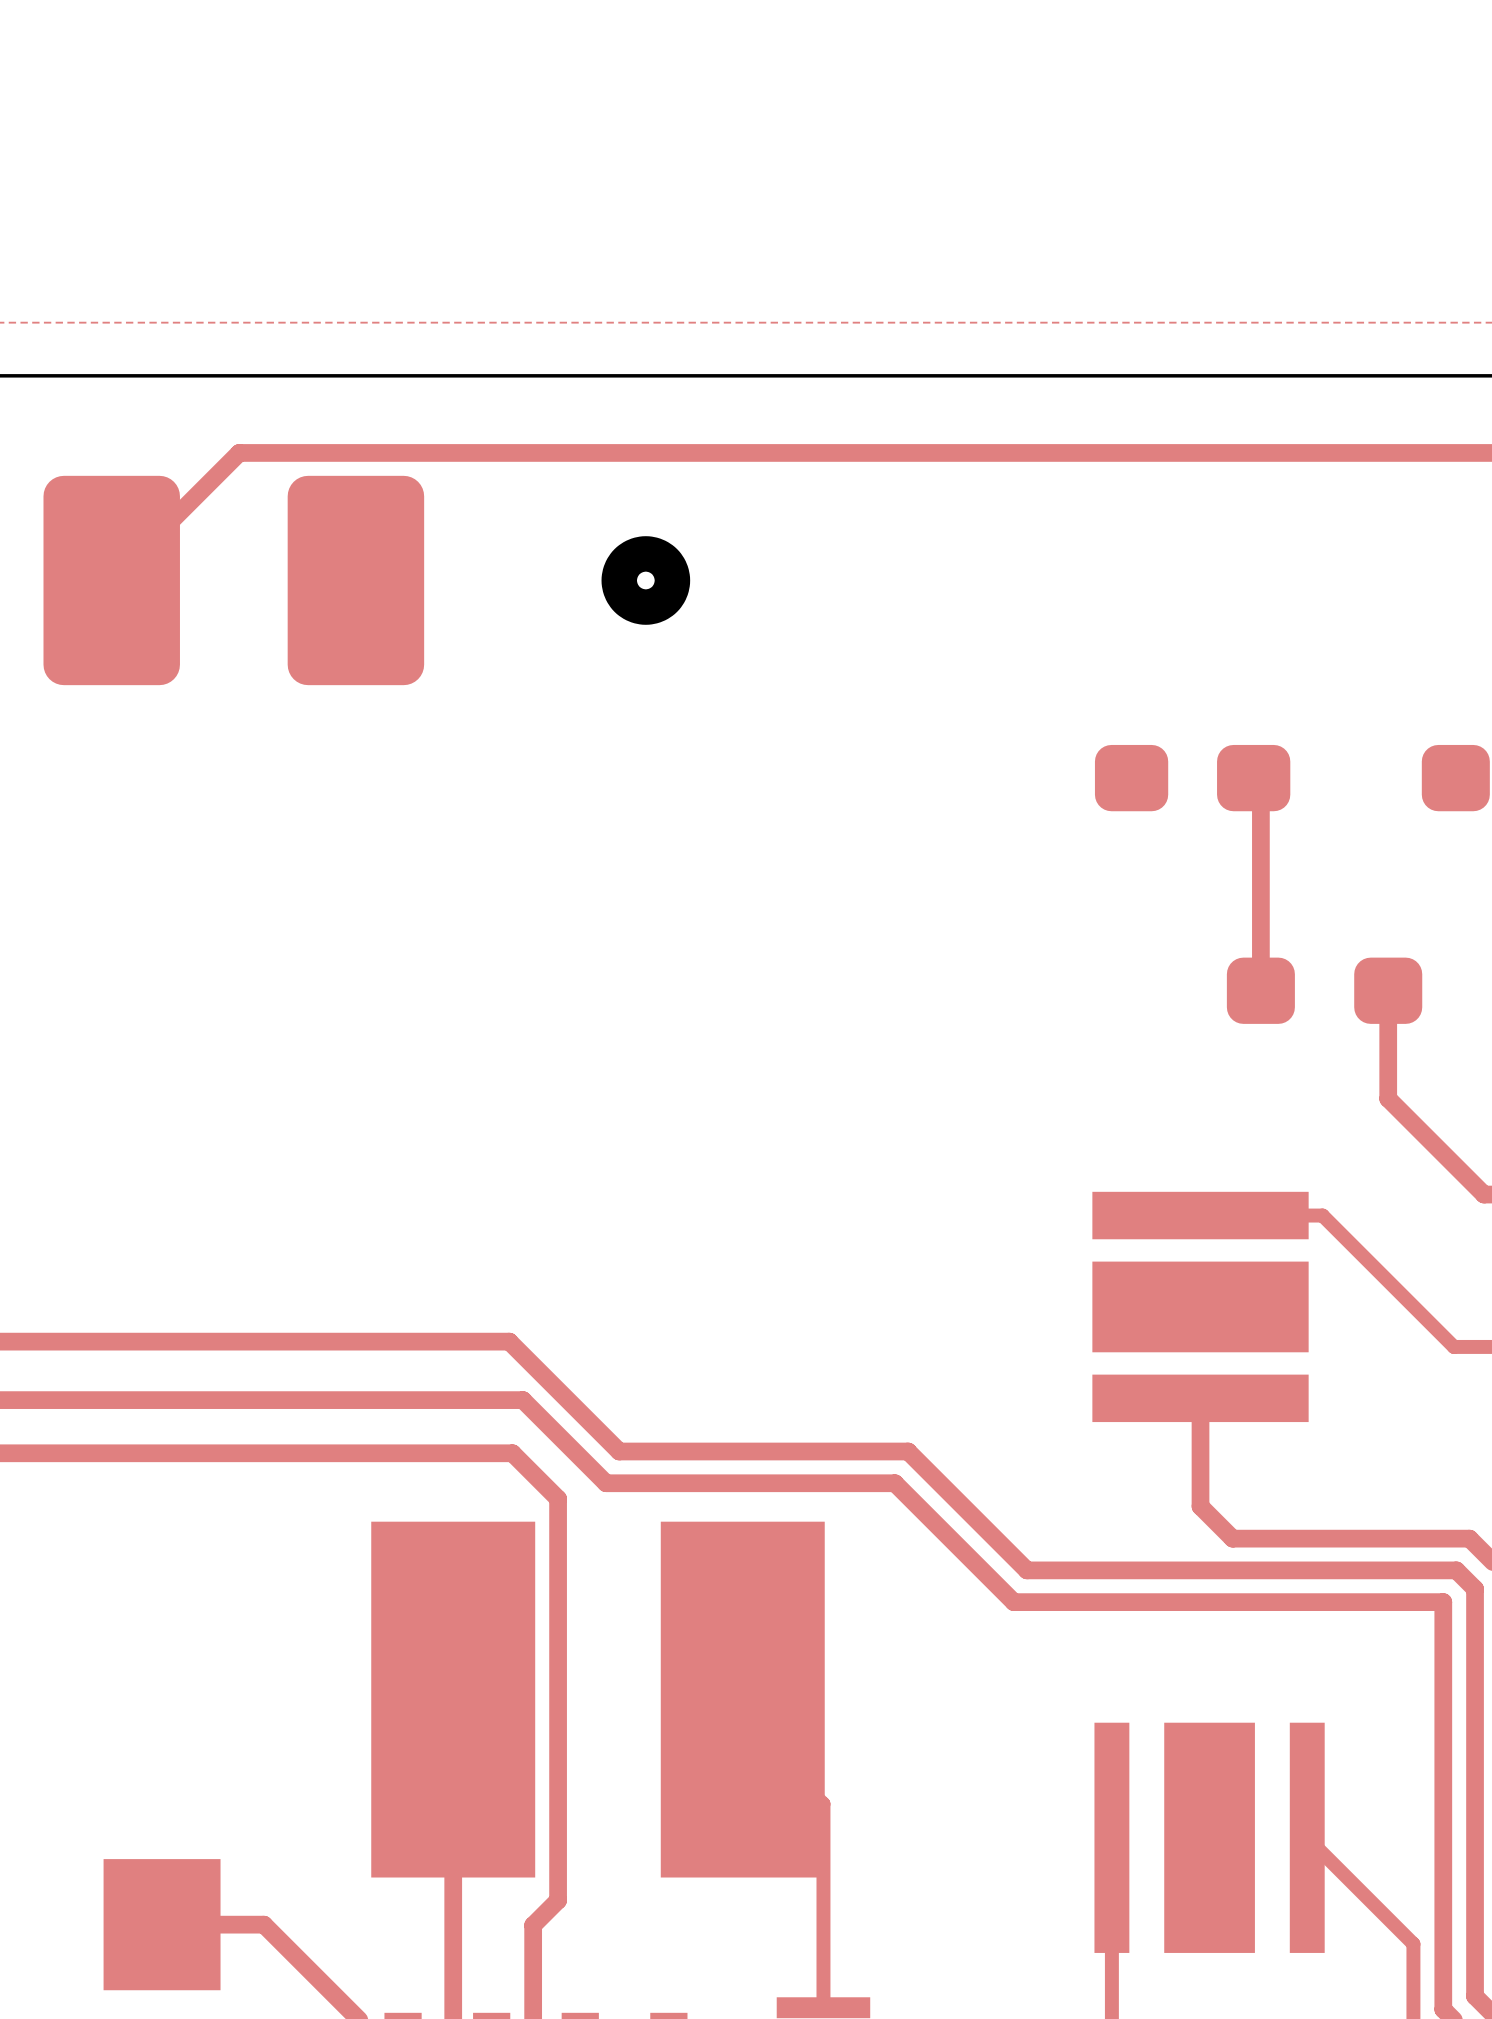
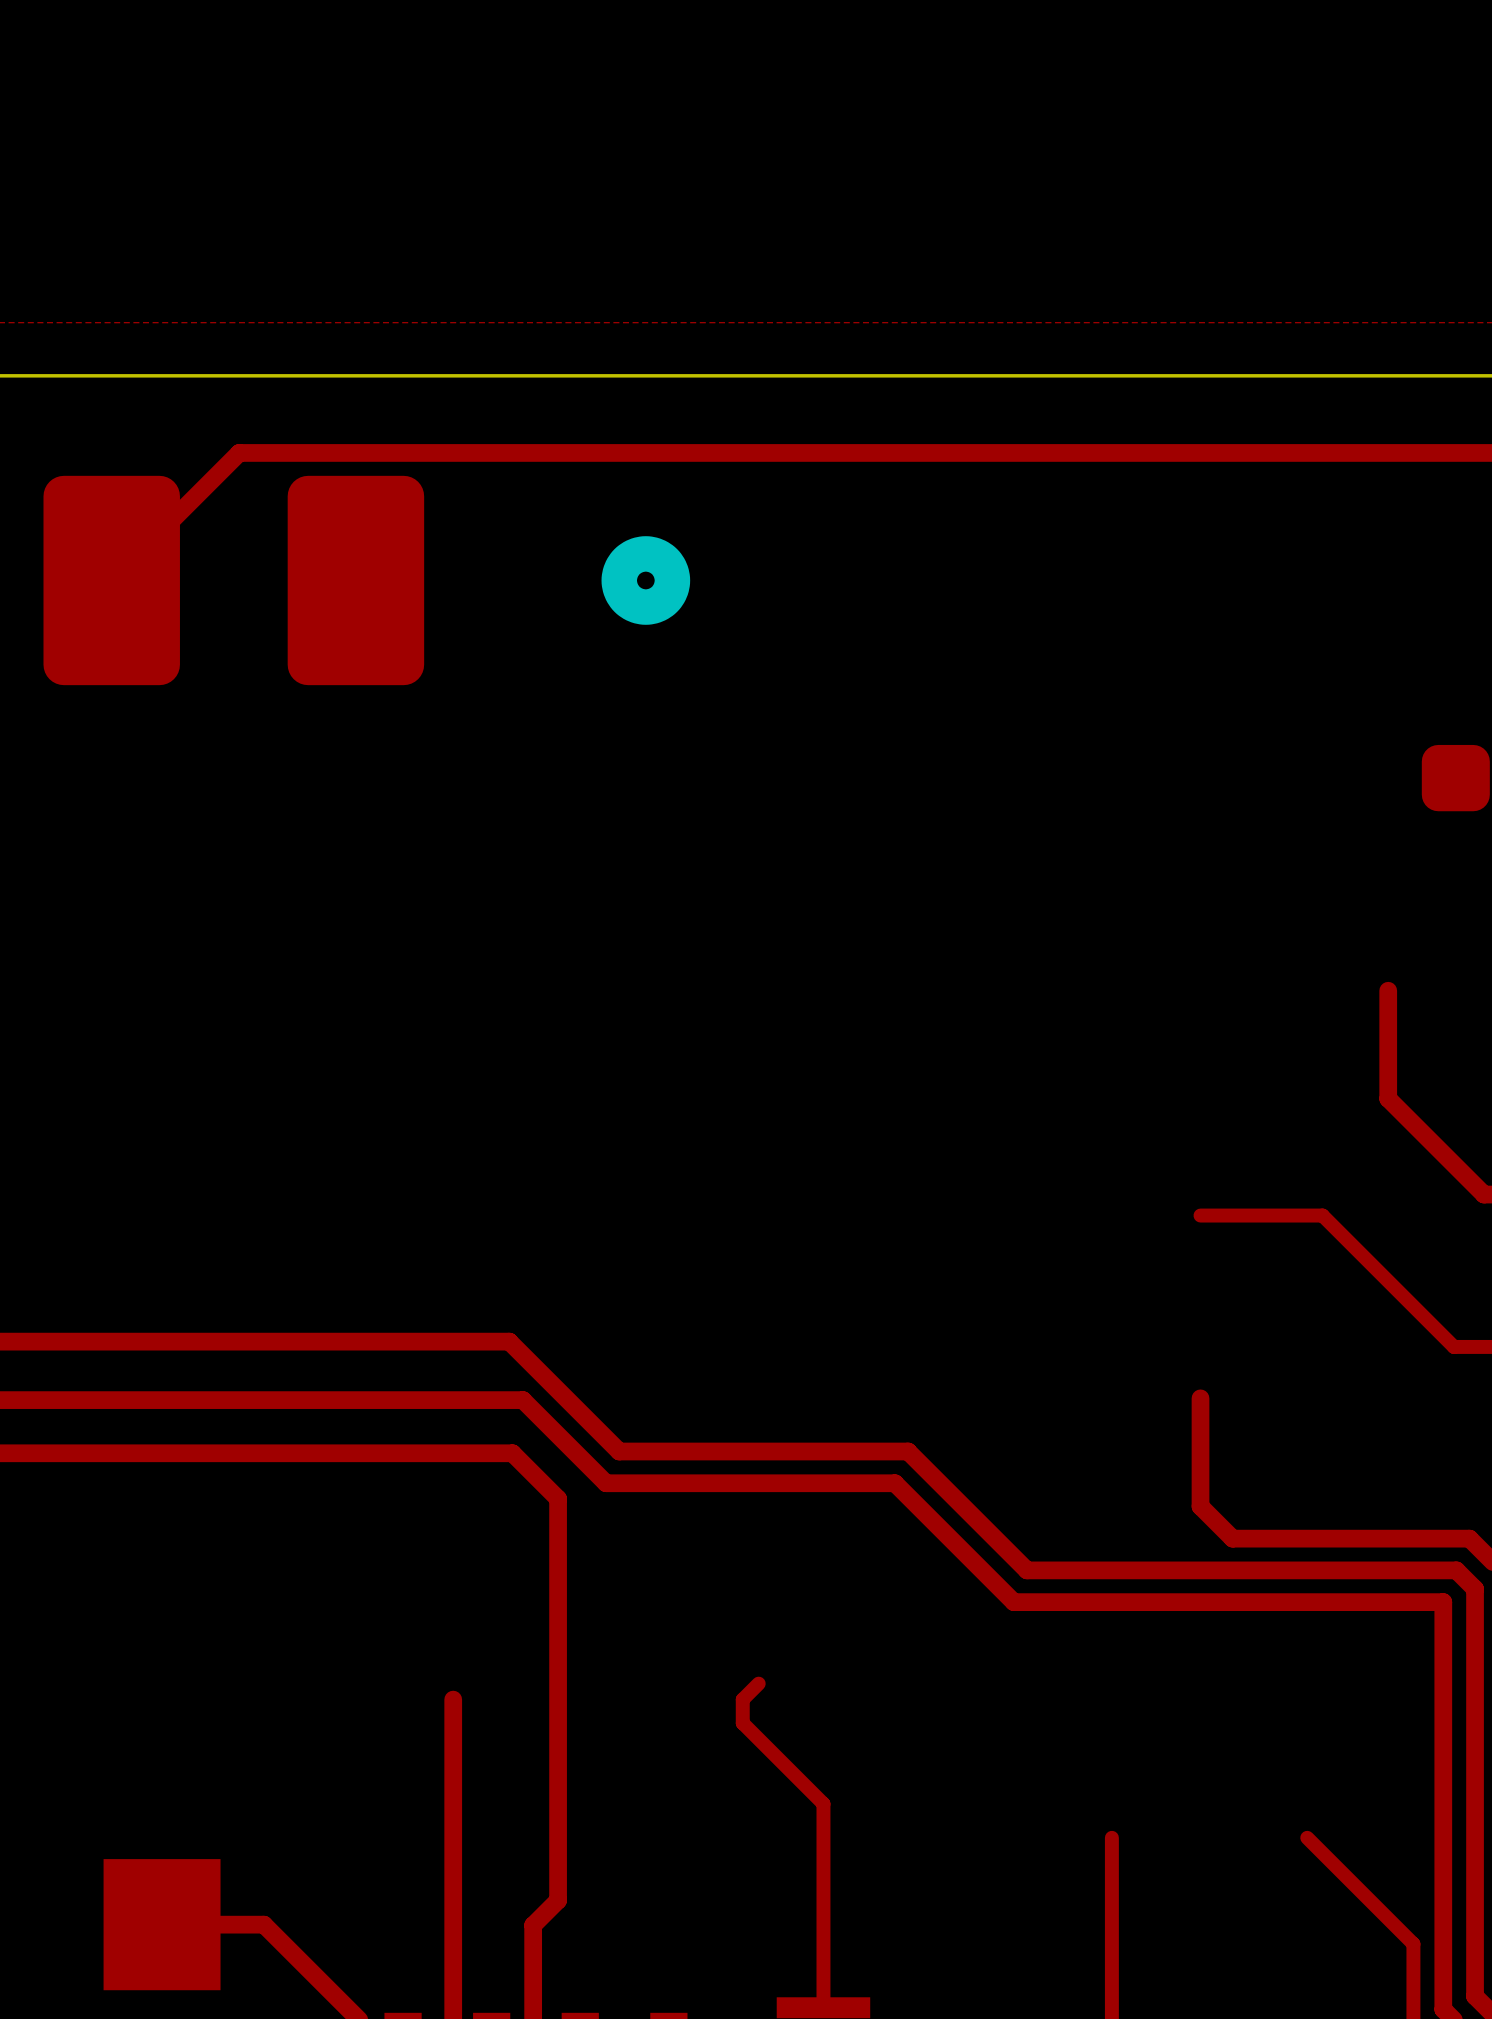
part: (1192, 778) -> none
top track: (1253, 778) (1260, 785) (1260, 990) -> none
part: (1324, 990) -> none
part: (1200, 1306) -> none
part: (597, 1699) -> none
part: (1209, 1837) -> none

